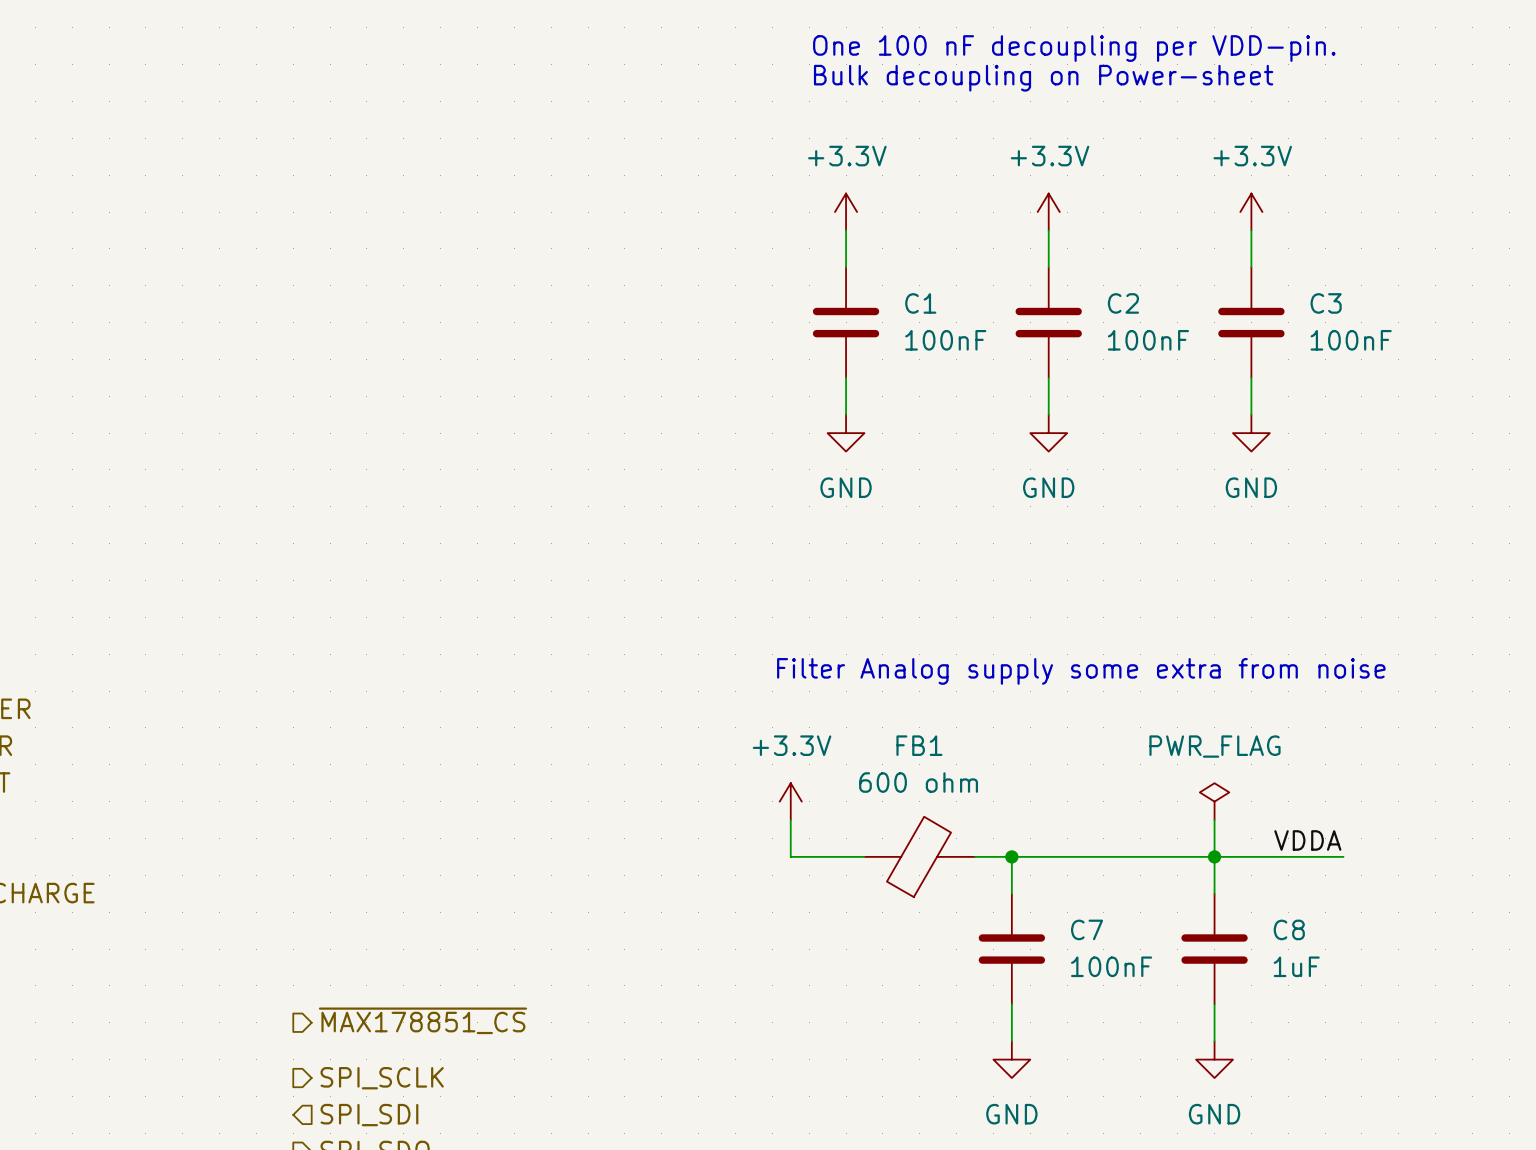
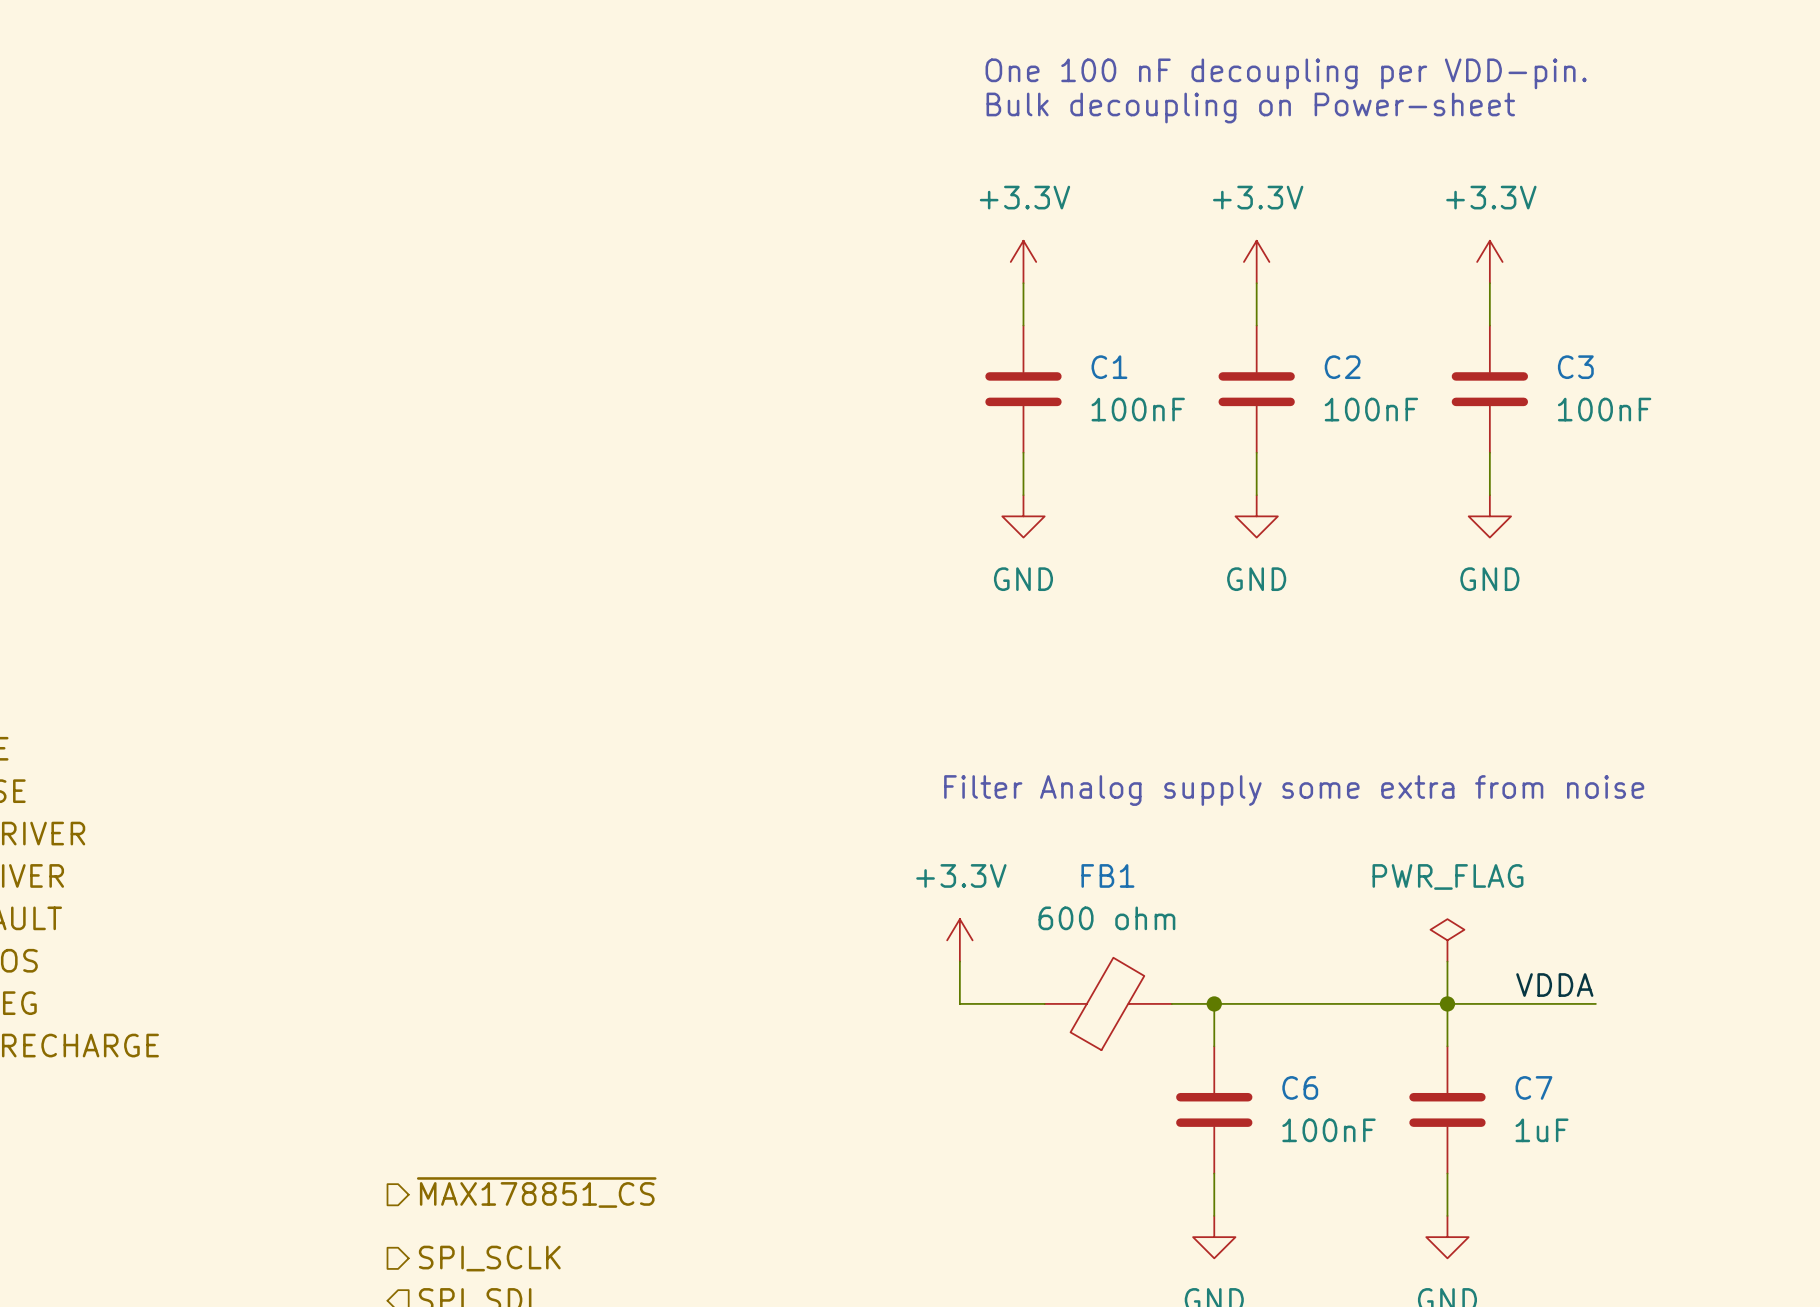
C7 name: C7 (1087, 929) -> C6 (1300, 1087)
C8 name: C8 (1289, 929) -> C7 (1533, 1087)

